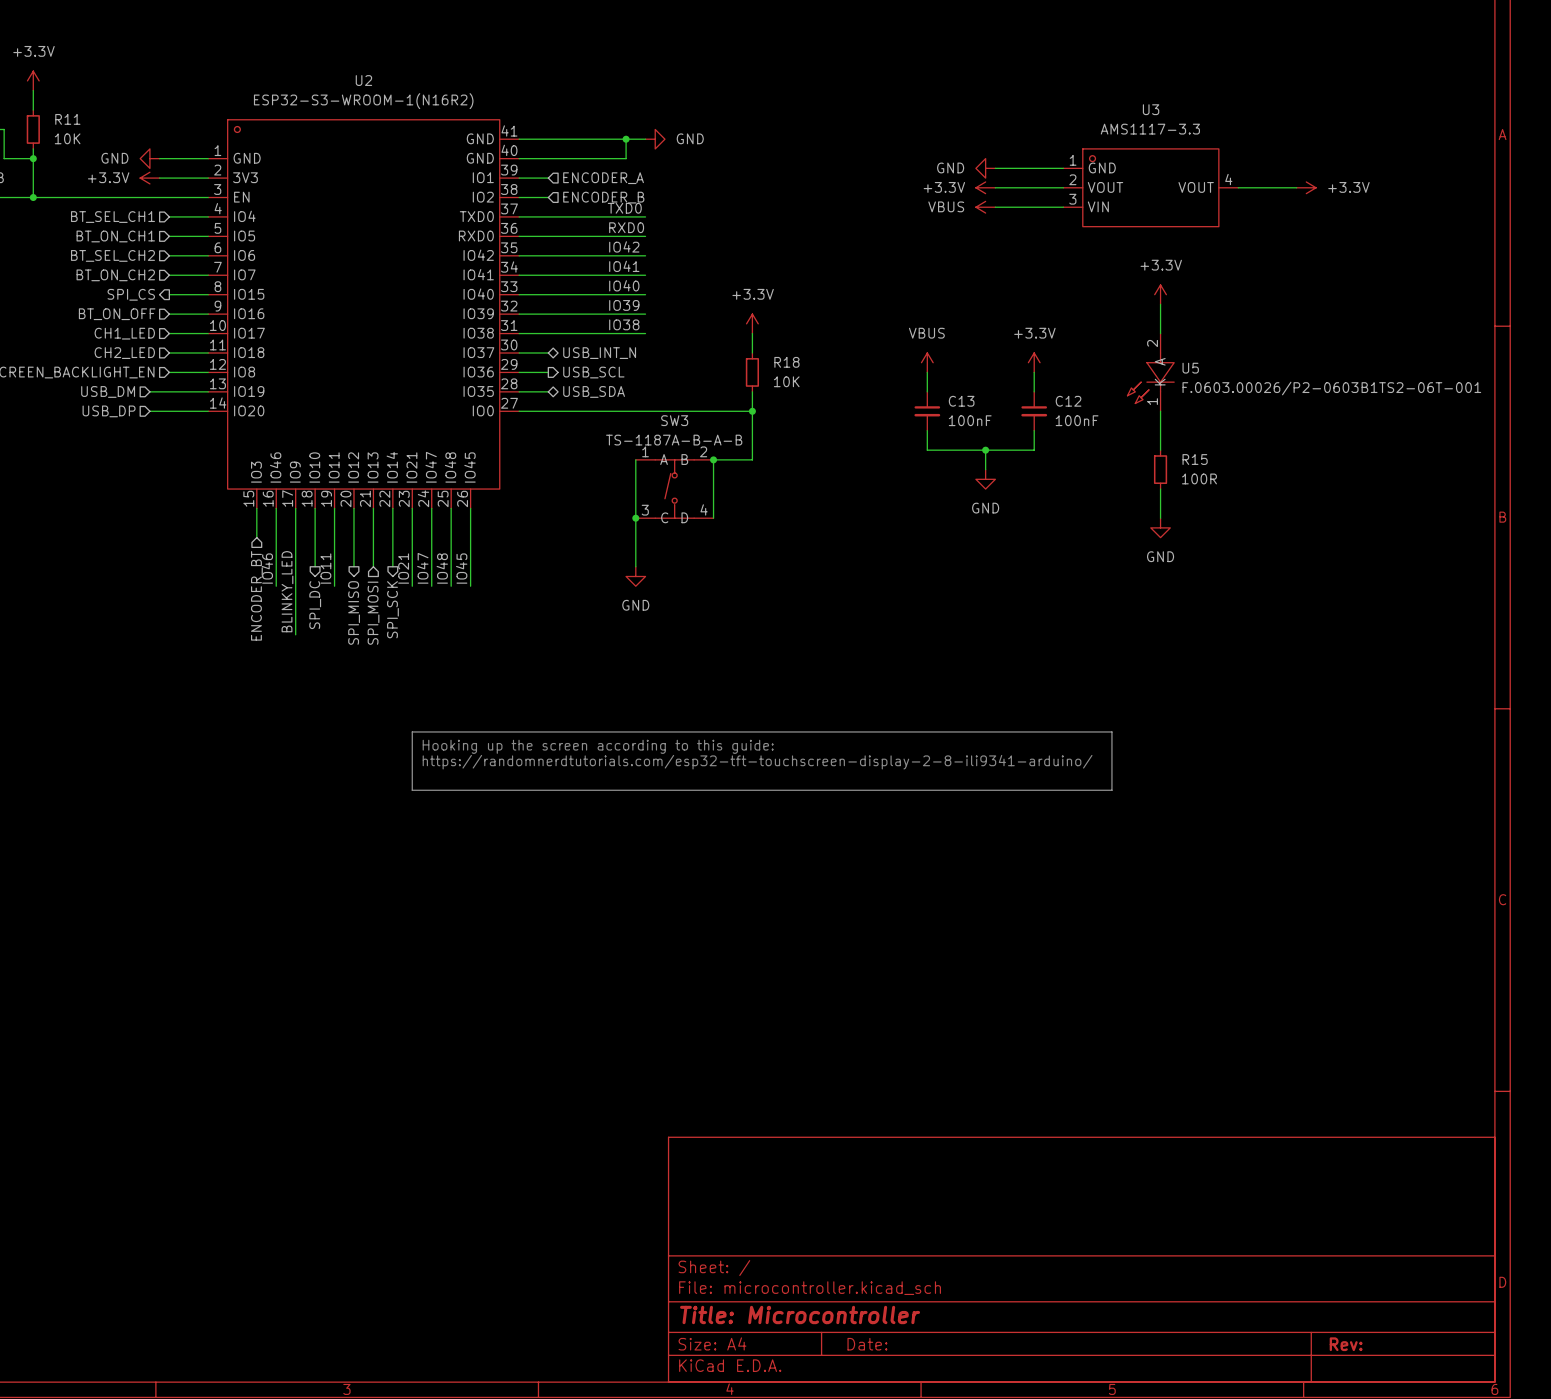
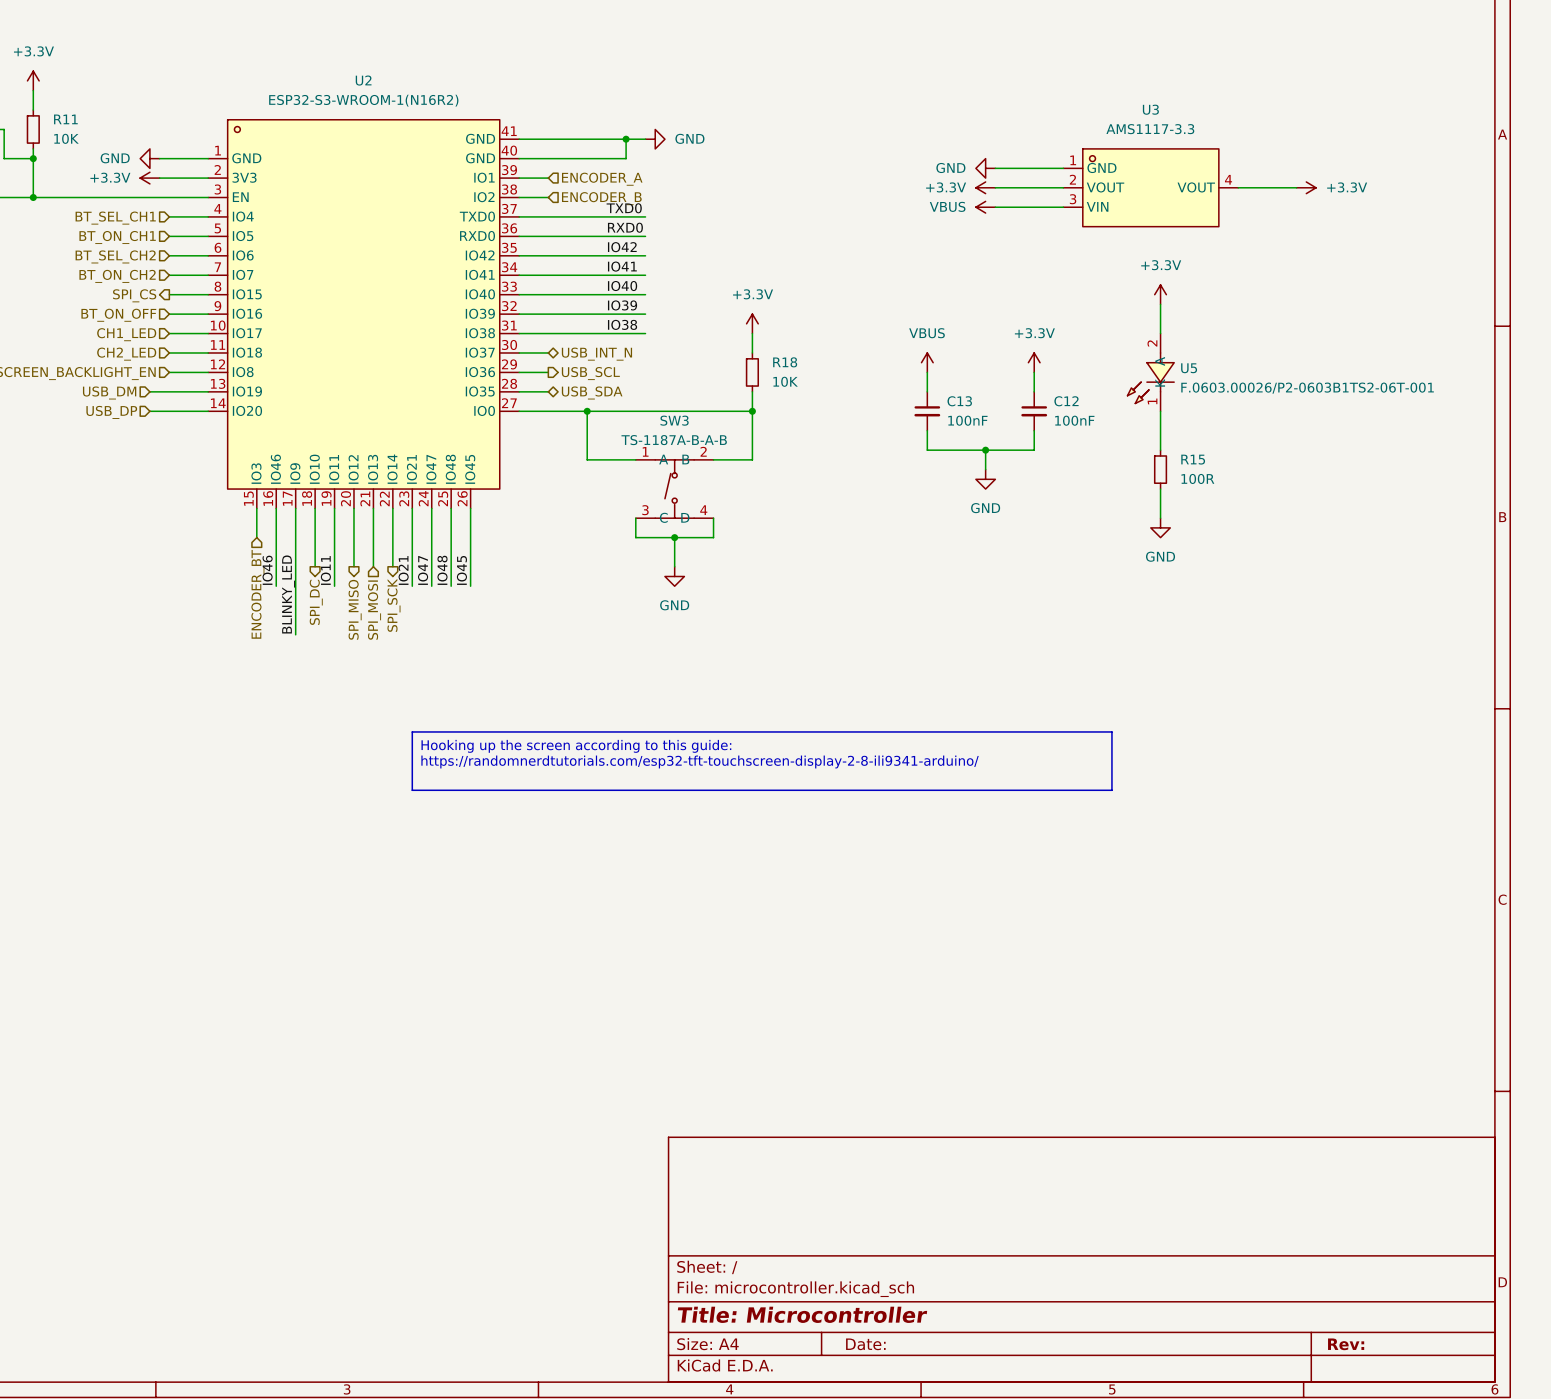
junction: none -> (587, 411)
wire: (635, 459) (635, 518) -> (635, 459) (587, 459) (587, 411)
wire: (713, 459) (713, 518) -> none
junction: (713, 459) -> none
junction: (635, 518) -> none
wire: (635, 537) (635, 566) -> (635, 537) (713, 537) (713, 518)
wire: none -> (674, 537) (674, 566)
junction: none -> (674, 537)
power symbol position: GND (635, 576) -> GND (674, 576)

